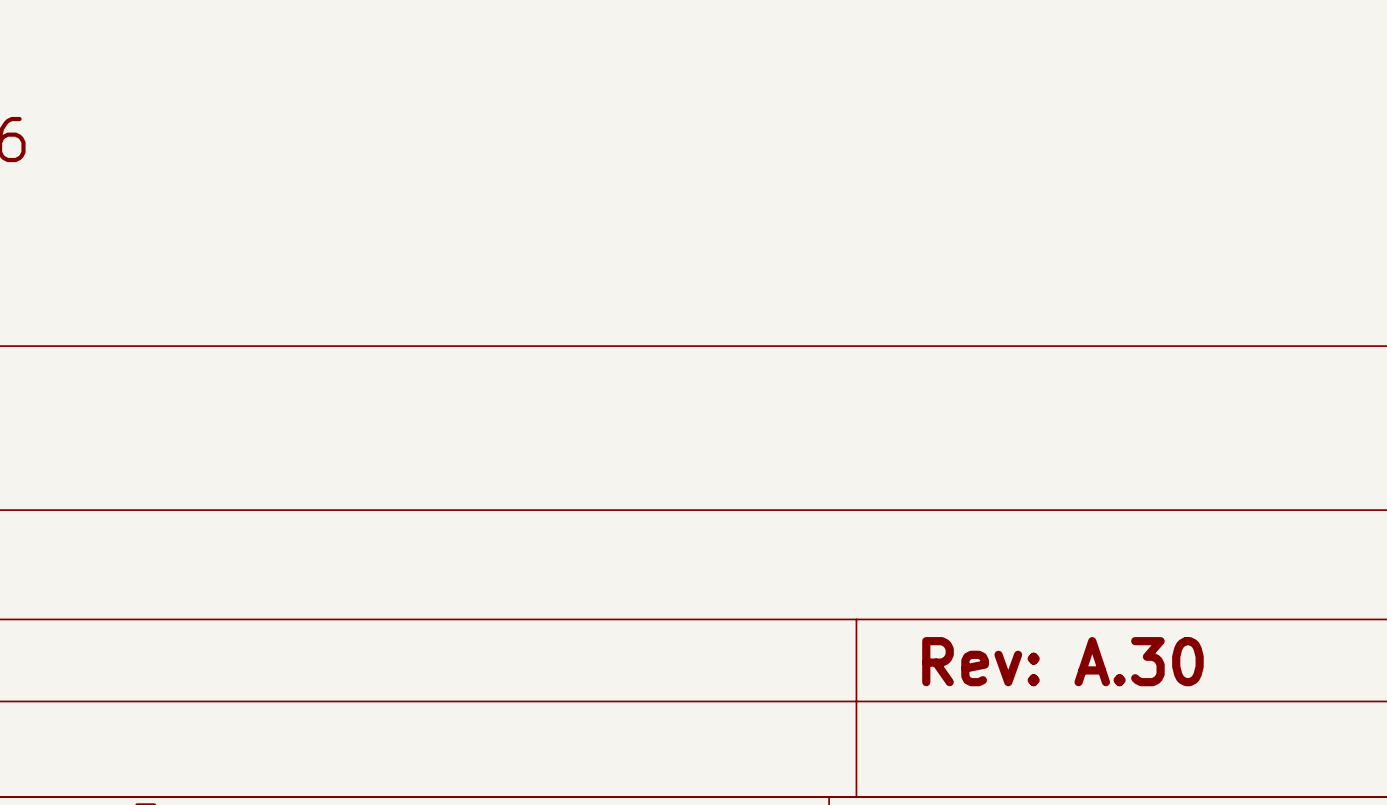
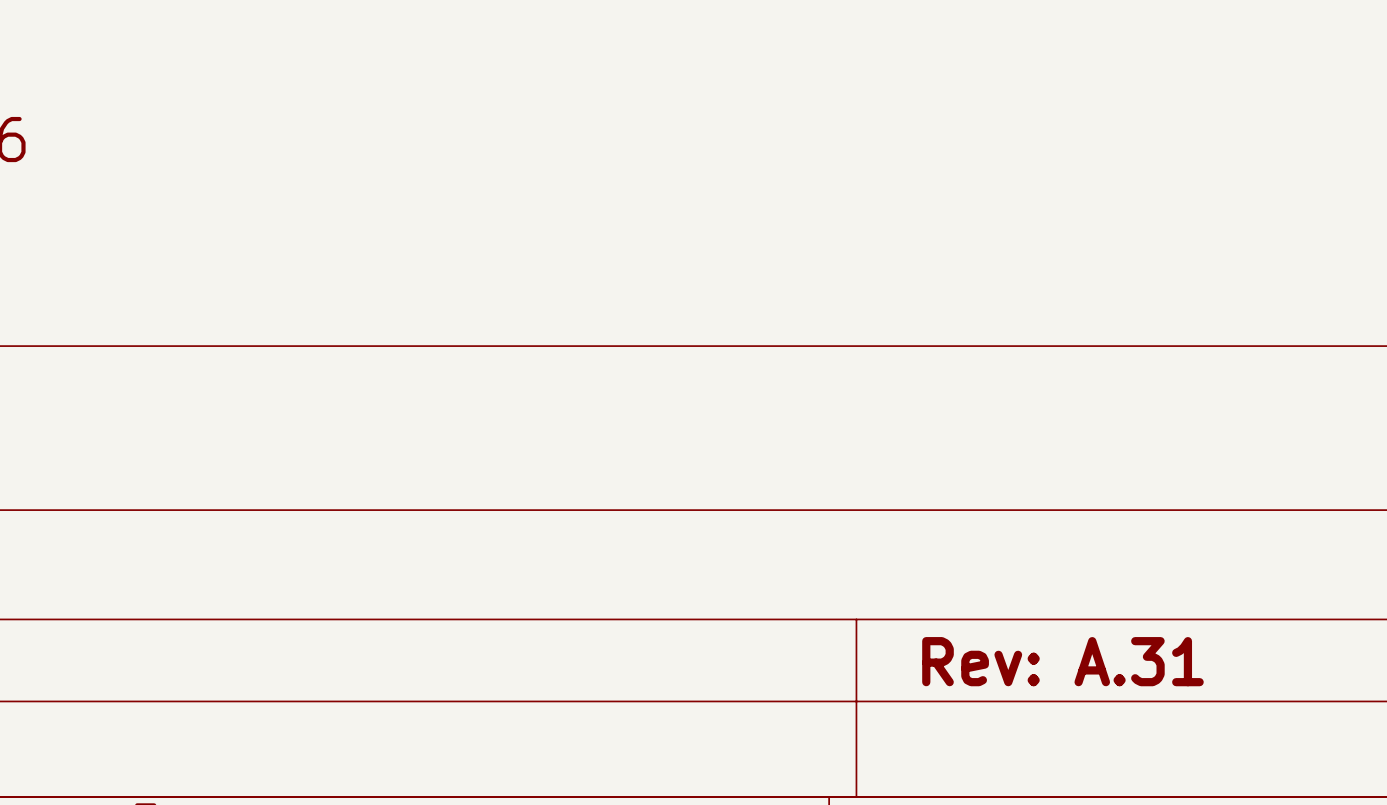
title block: Rev: A.30 (1062, 661) -> Rev: A.31 (1062, 661)

